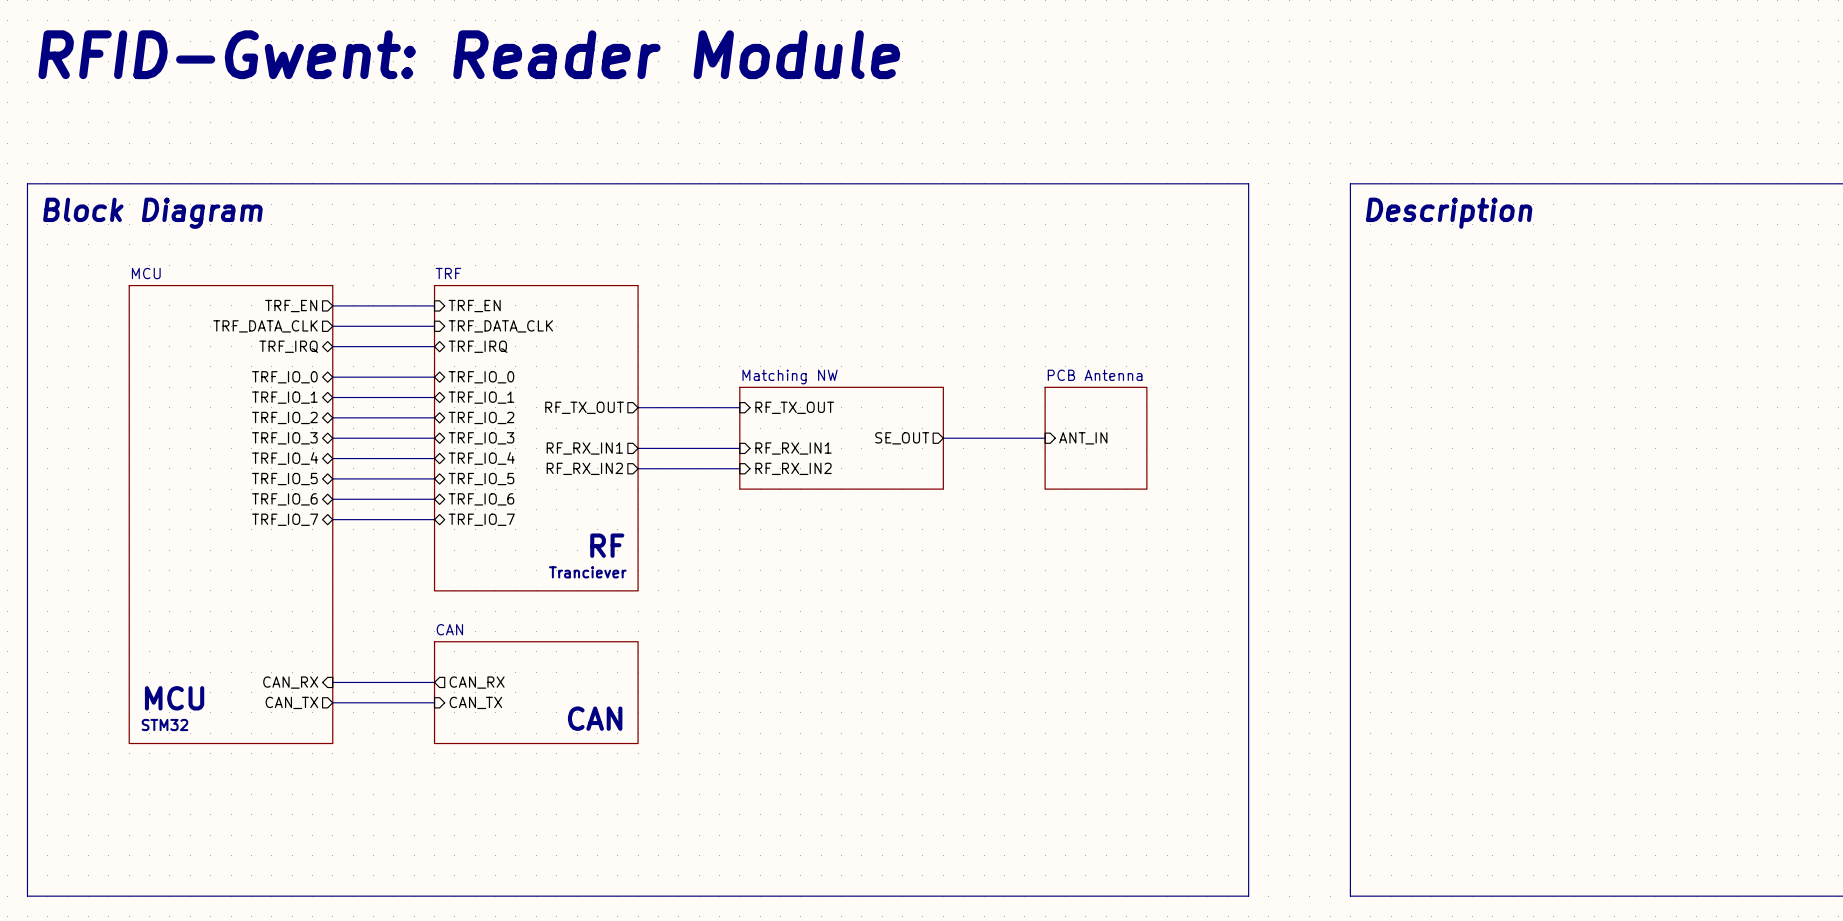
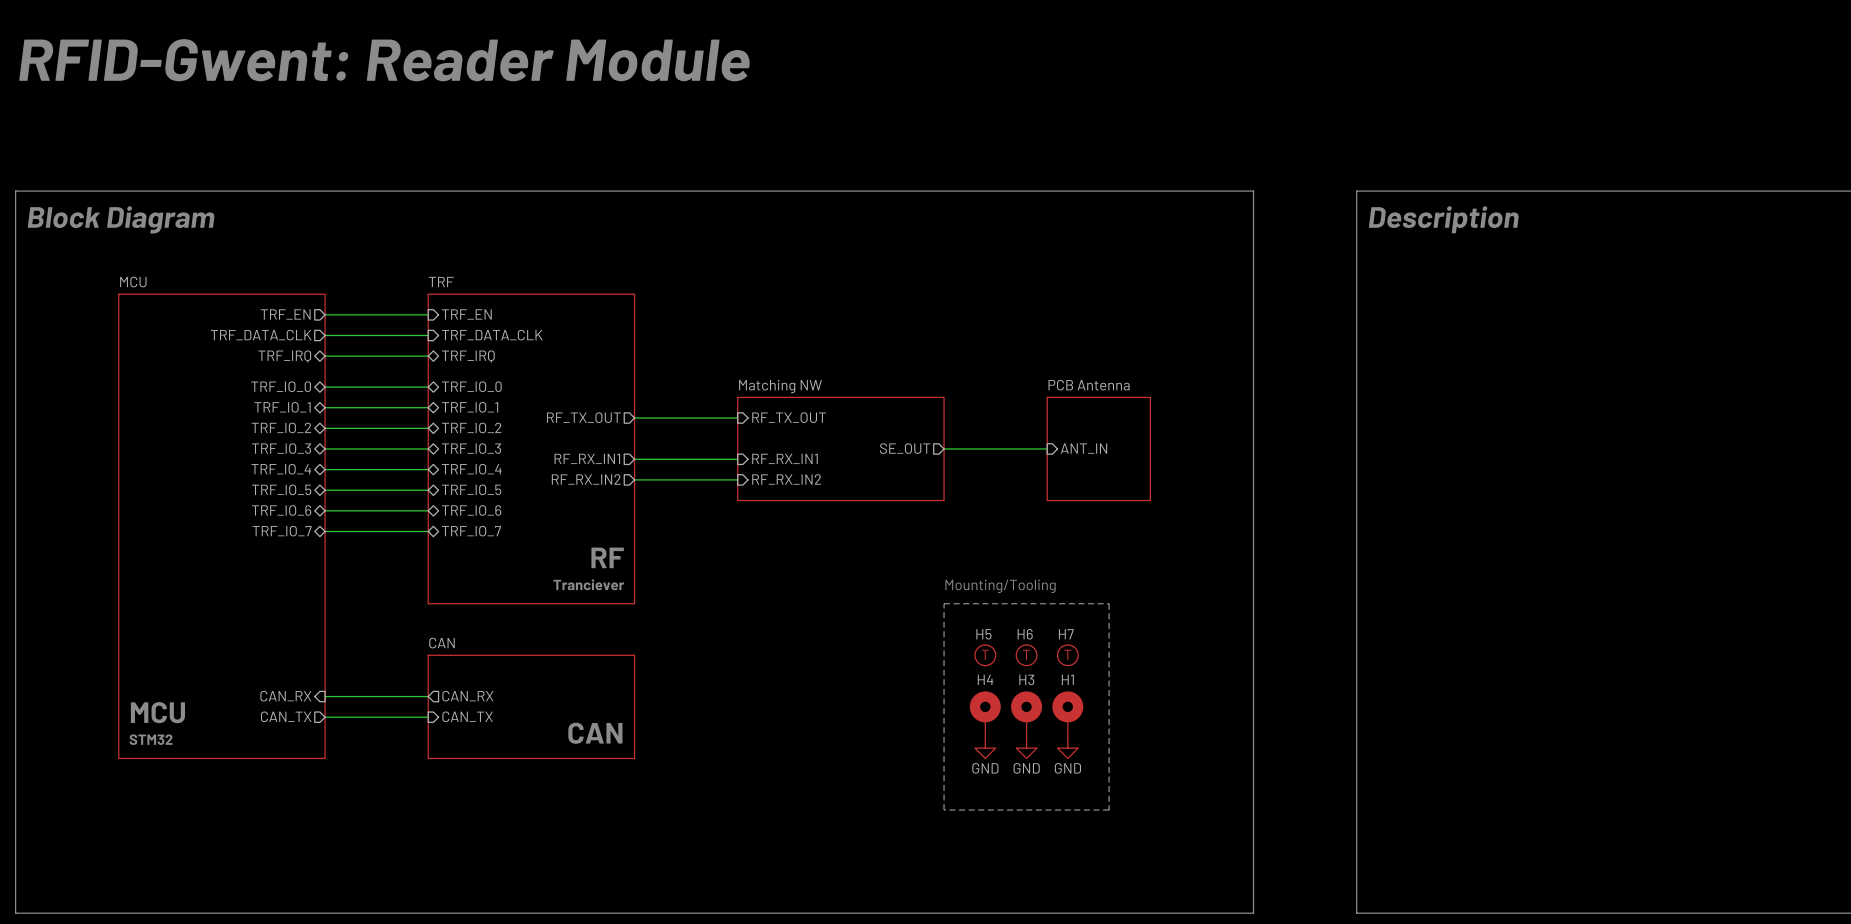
text: none -> Mounting/Tooling (1000, 586)
line: none -> (944, 603) (1109, 603) (1109, 810) (944, 810) (944, 603)
H5: none -> (985, 655)
H6: none -> (1026, 655)
H7: none -> (1067, 655)
H4: none -> (985, 714)
H3: none -> (1026, 714)
H1: none -> (1067, 714)
power symbol: none -> GND (985, 748)
power symbol: none -> GND (1026, 748)
power symbol: none -> GND (1067, 748)

